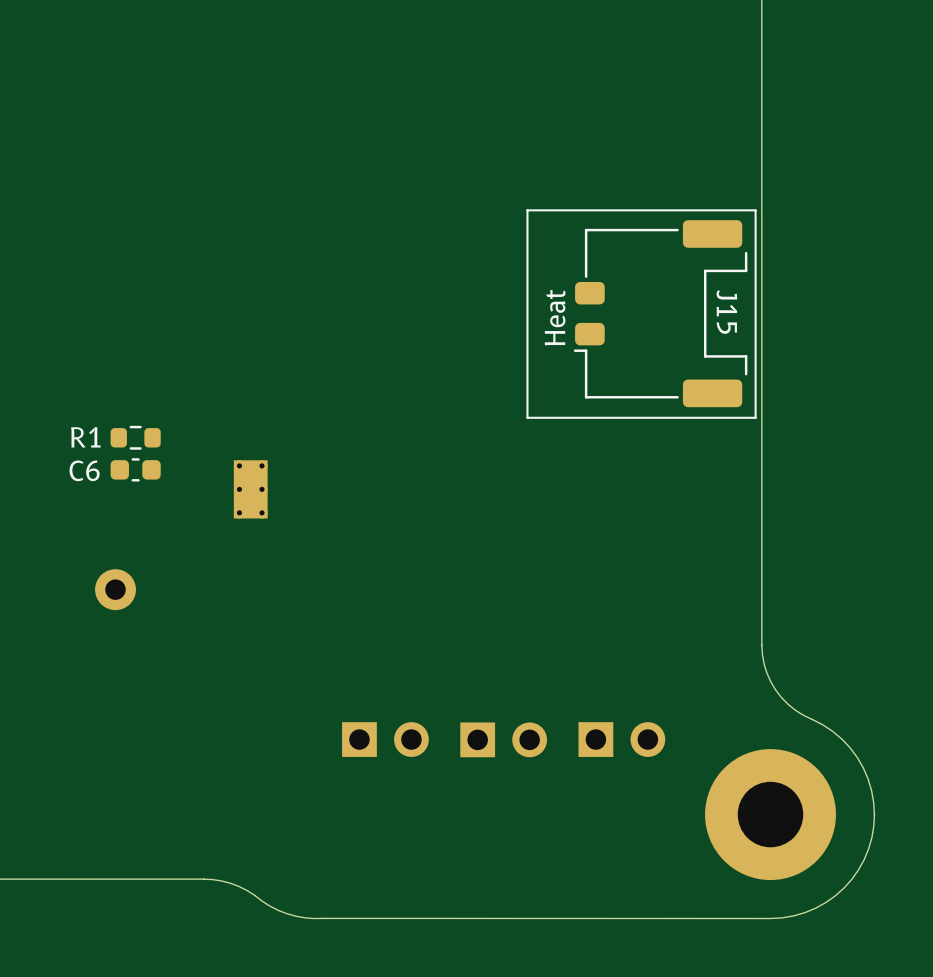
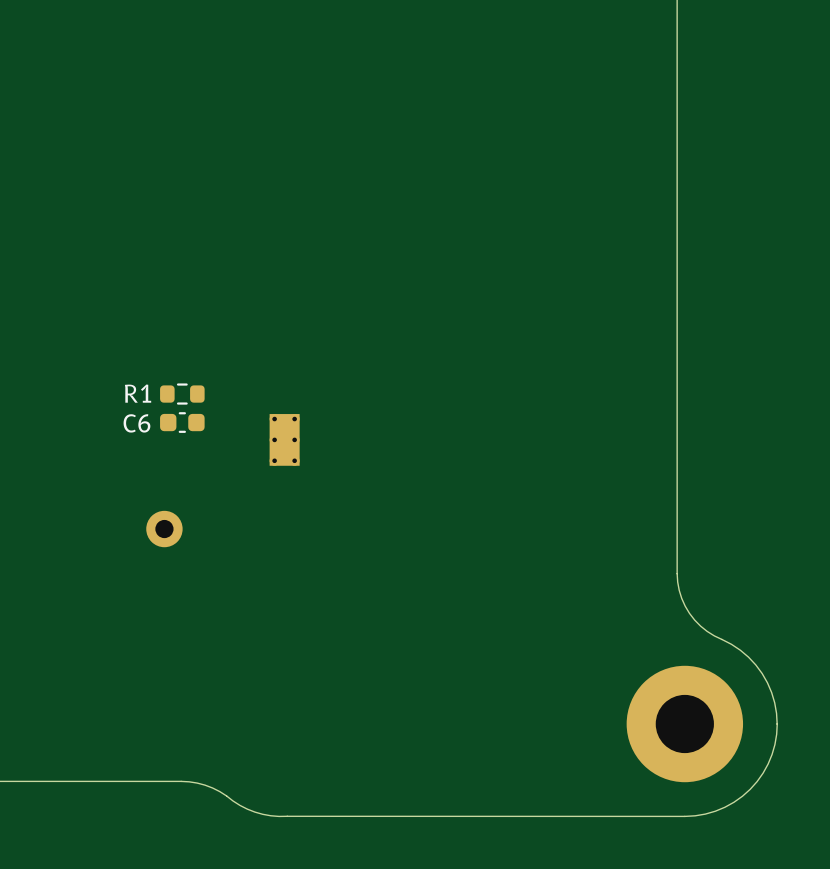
line: (755, 210) (527, 210) (527, 417) (755, 417) (755, 210) -> none
J15: (660, 313) -> none
text: Heat (555, 317) -> none
R1 position: (135, 437) -> (182, 394)
C6 position: (135, 469) -> (182, 422)
part position: (250, 489) -> (284, 439)
part position: (115, 589) -> (164, 529)
part: (385, 739) -> none
part: (503, 739) -> none
part: (621, 739) -> none

